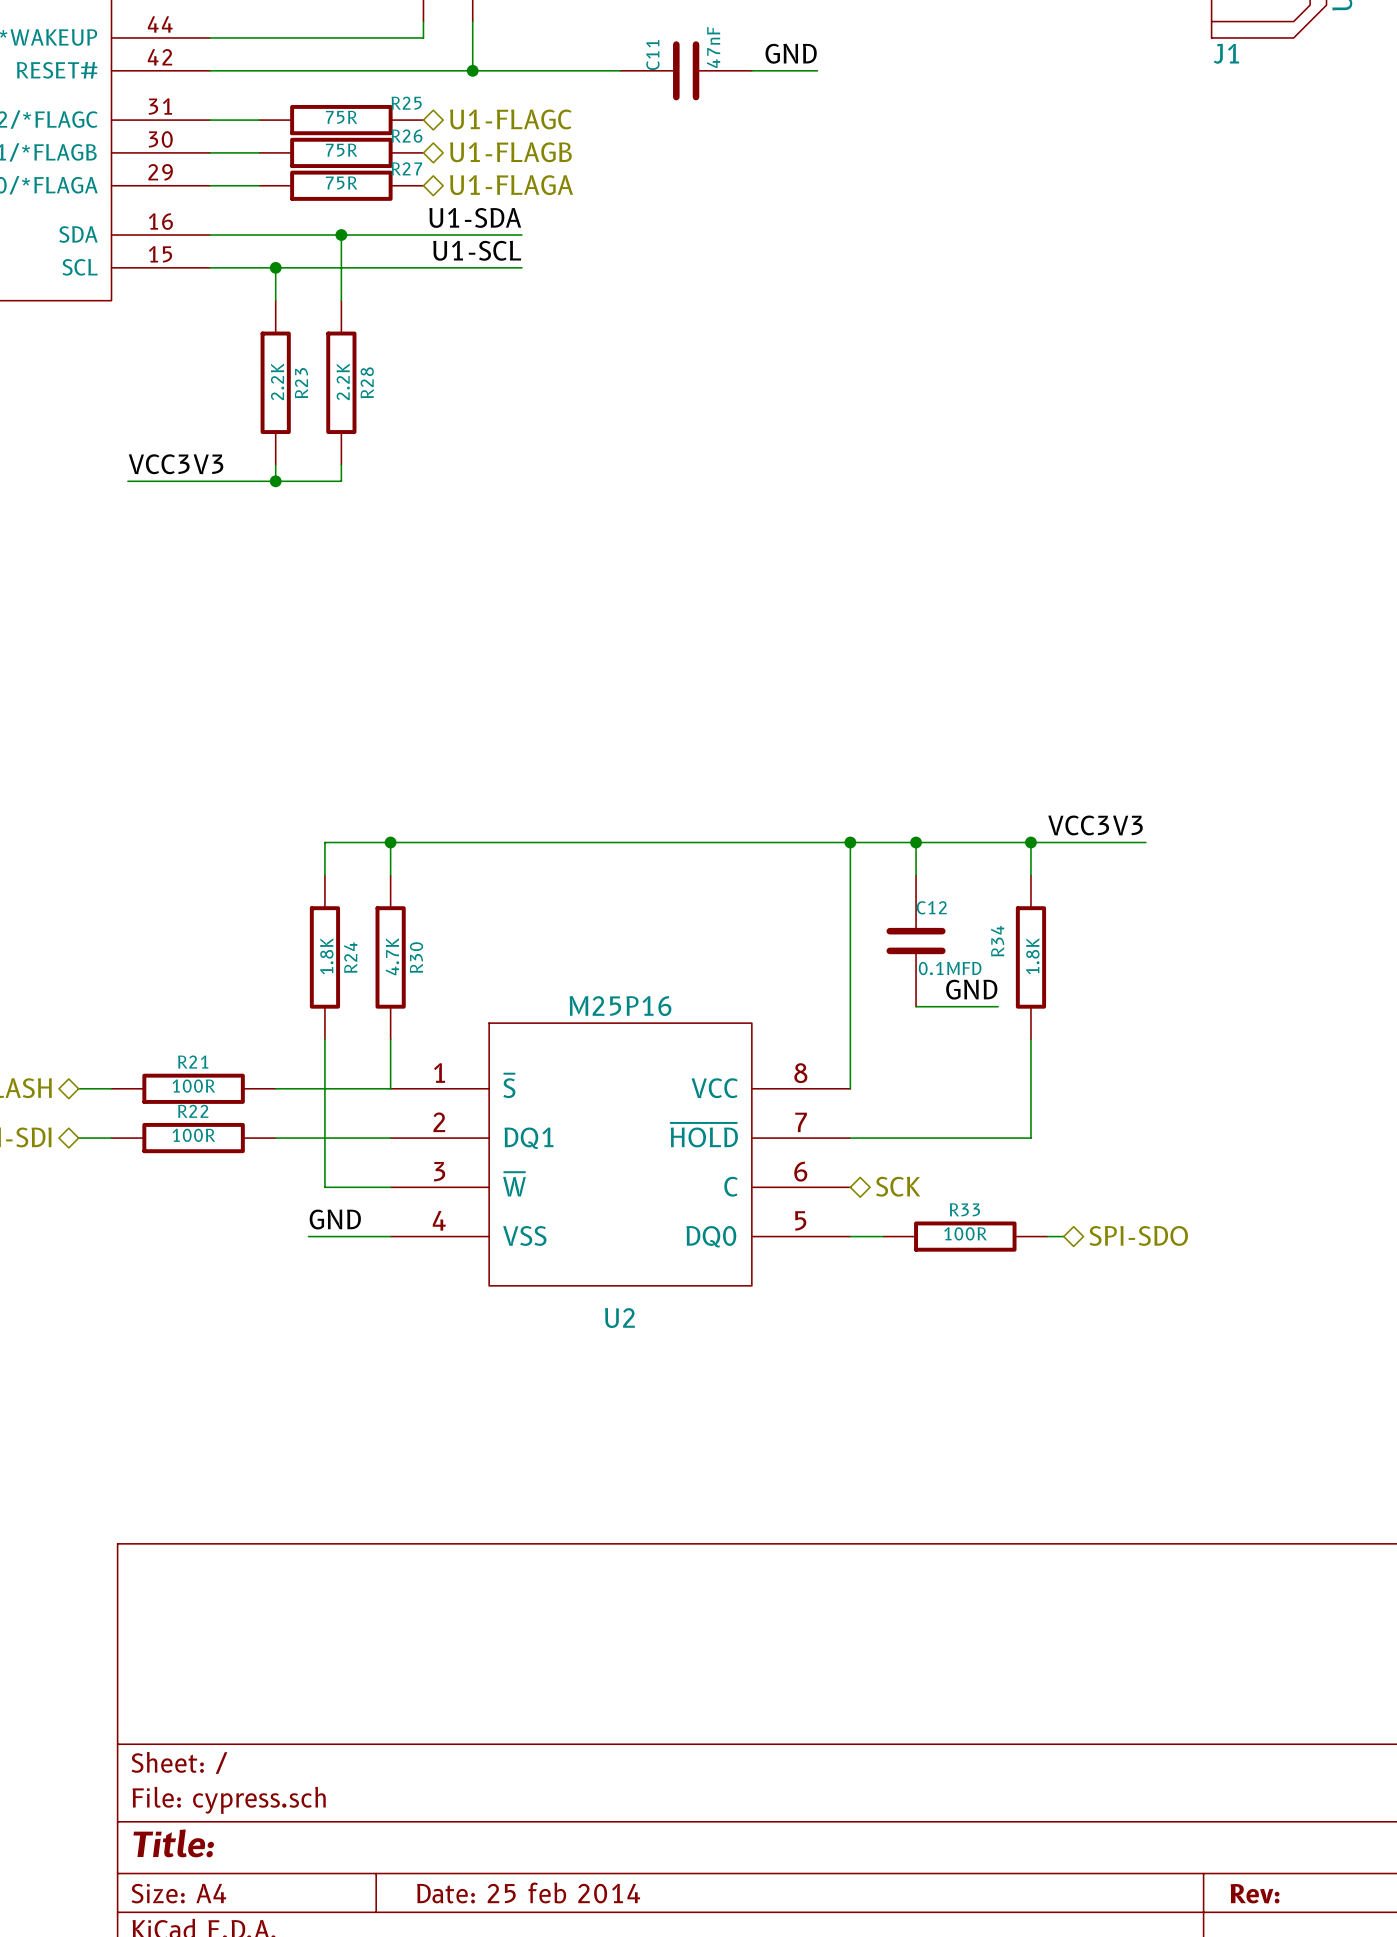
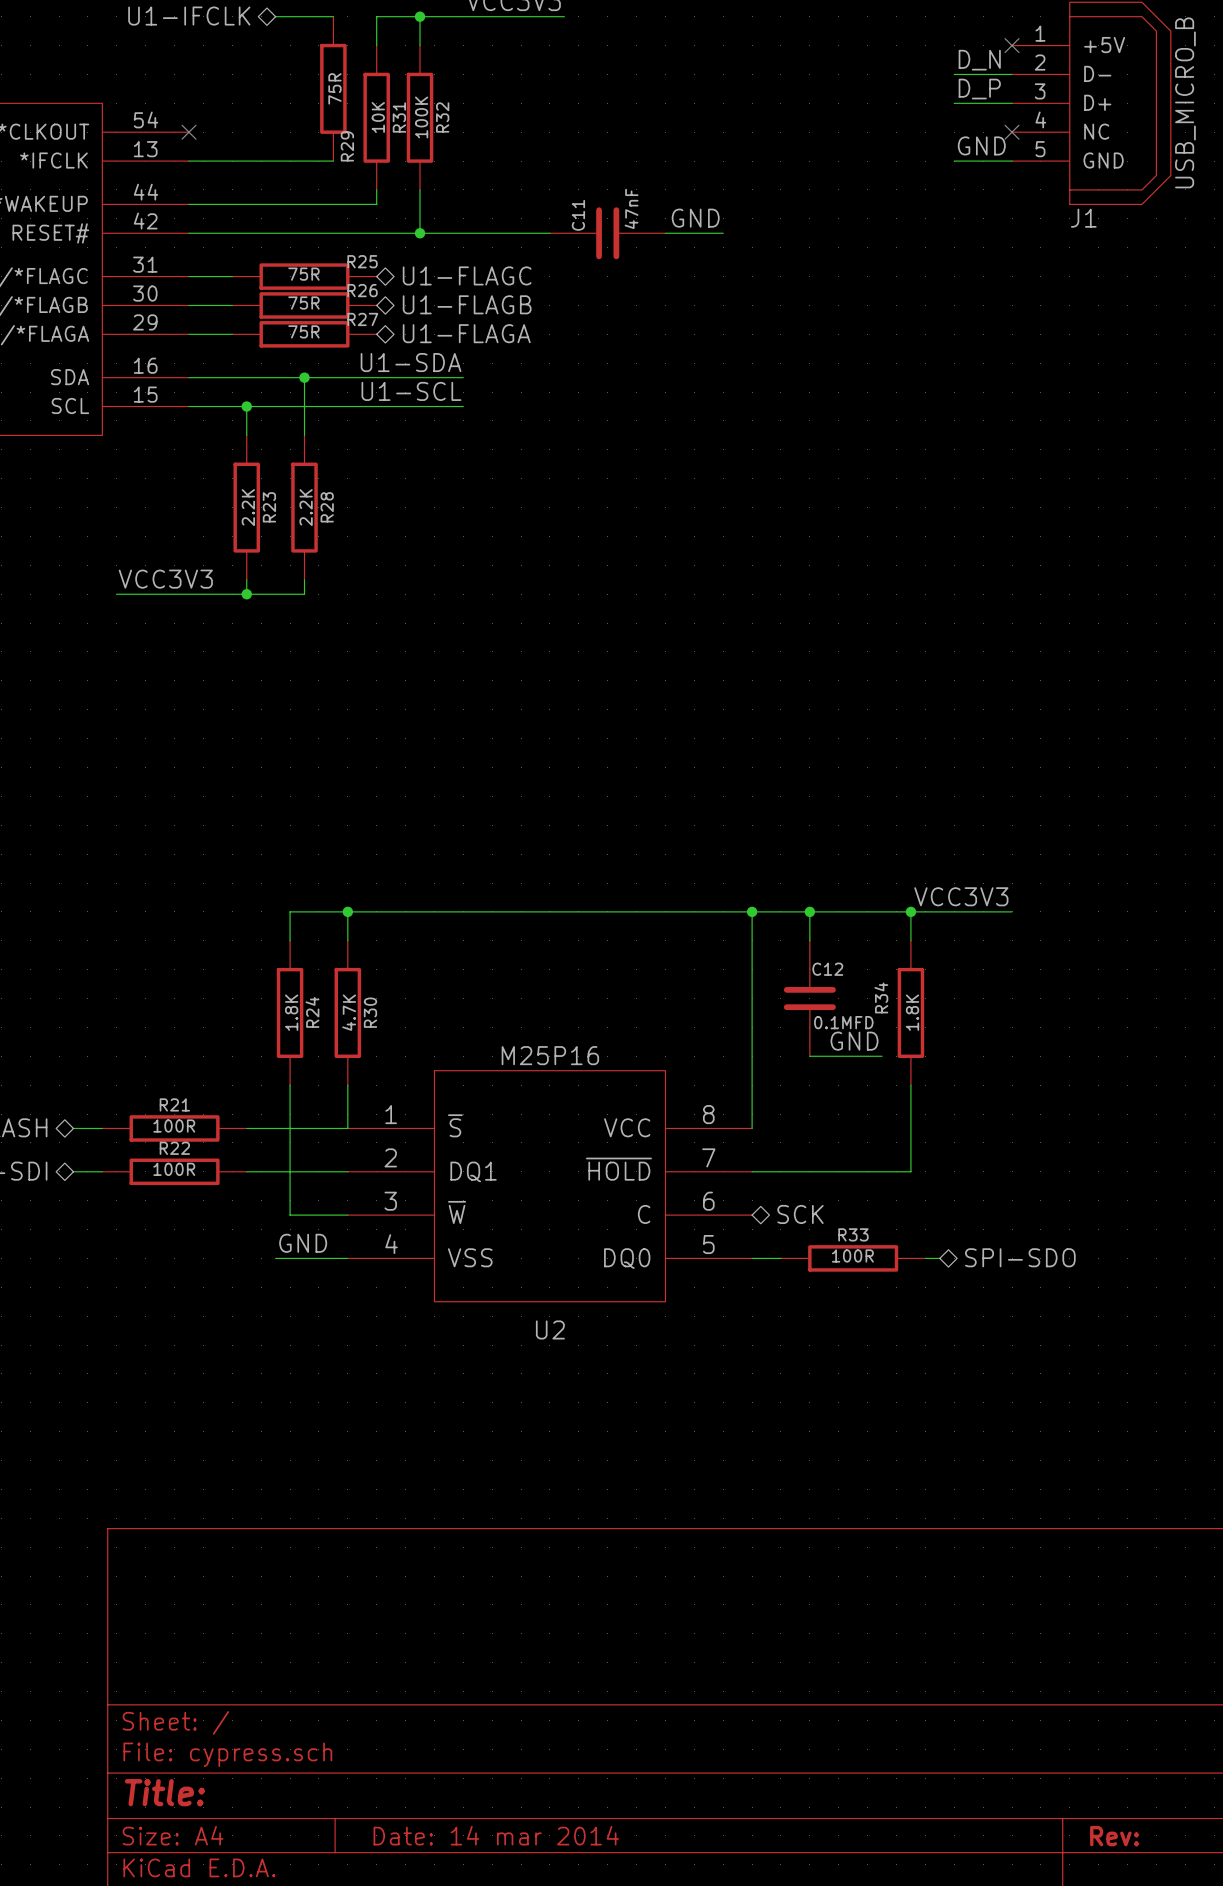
title block: Date: 25 feb 2014 (528, 1892) -> Date: 14 mar 2014 (496, 1835)

